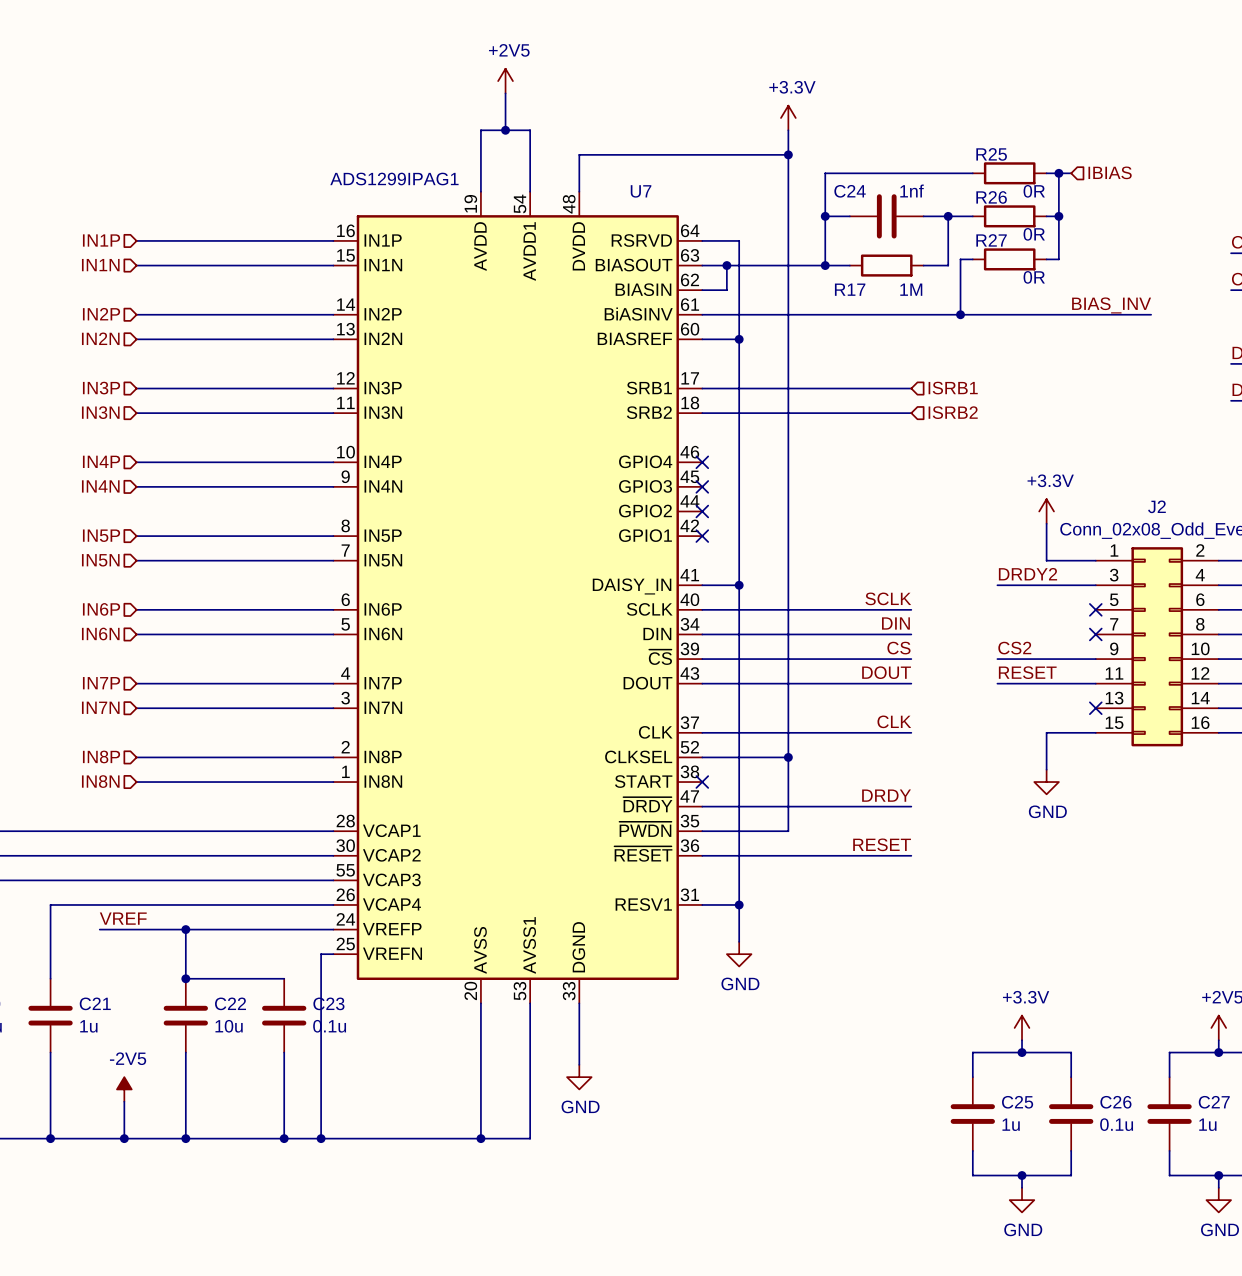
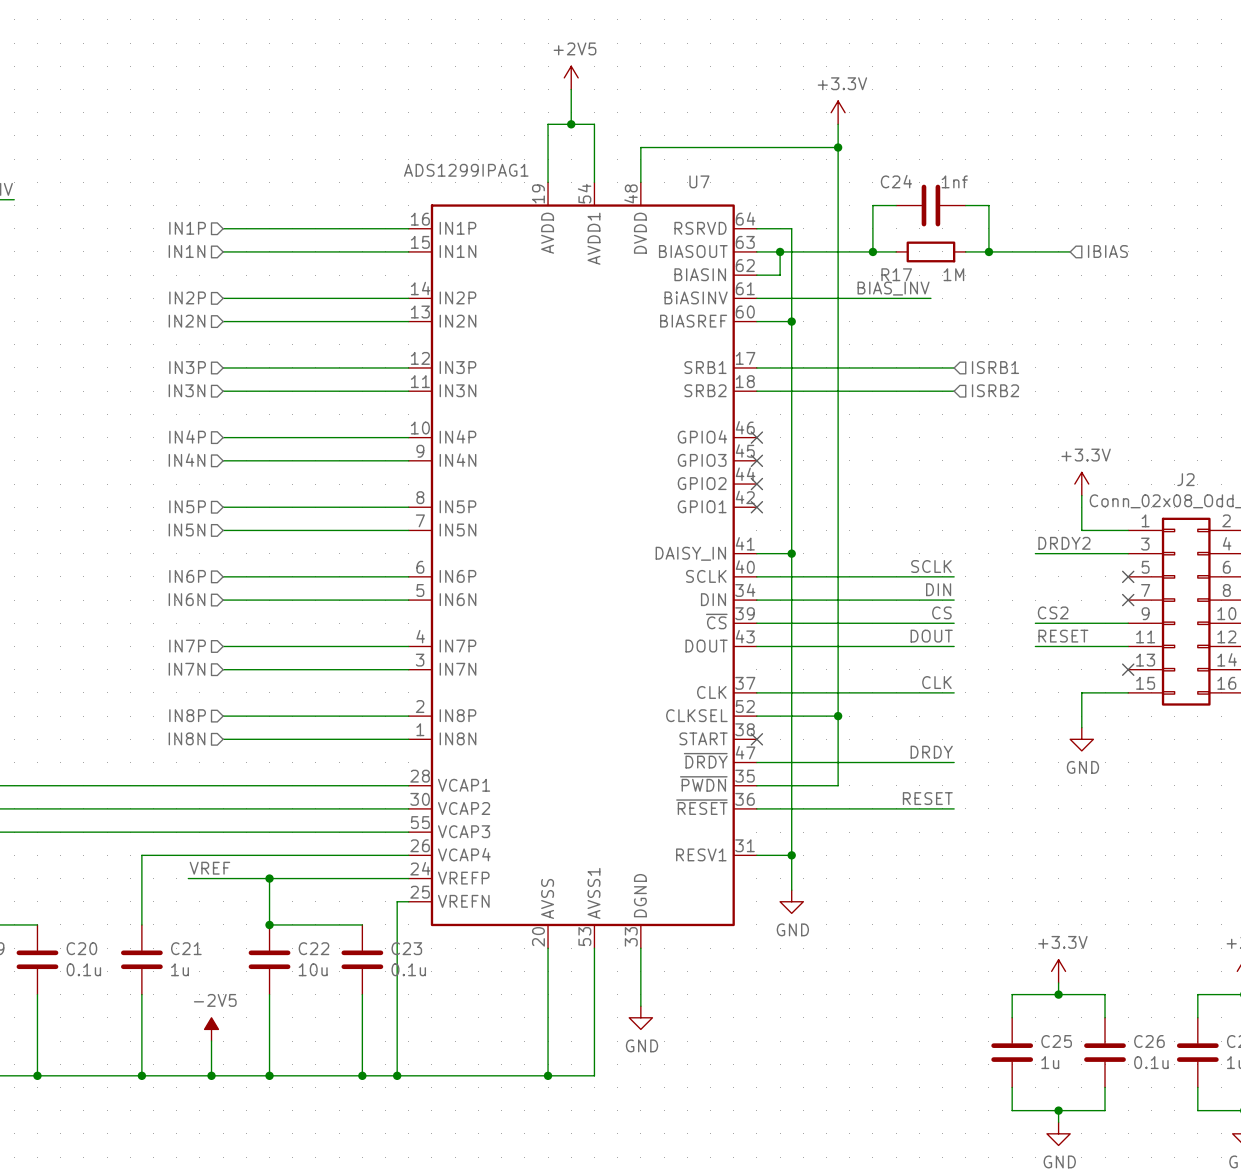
hierarchical label position: IBIAS (1110, 172) -> IBIAS (1107, 251)
wire: (972, 173) (825, 173) (825, 216) -> none
R25: 0R (1009, 173) -> none
wire: (1046, 173) (1071, 173) -> none
wire: (1058, 173) (1058, 259) (1046, 259) -> none
junction: (1058, 173) -> none
junction: (825, 216) -> none
wire: (948, 216) (972, 216) -> none
junction: (948, 216) -> none
R26: 0R (1009, 216) -> none
wire: (1046, 216) (1058, 216) -> none
junction: (1058, 216) -> none
wire: (972, 259) (960, 259) (960, 314) -> none
R27: 0R (1009, 259) -> none
wire: none -> (988, 251) (1070, 251)
junction: none -> (988, 251)
label: none -> BIAS_INV (893, 288)
label: BIAS_INV (1111, 305) -> none
wire: (886, 314) (1151, 314) -> none
junction: (960, 314) -> none

